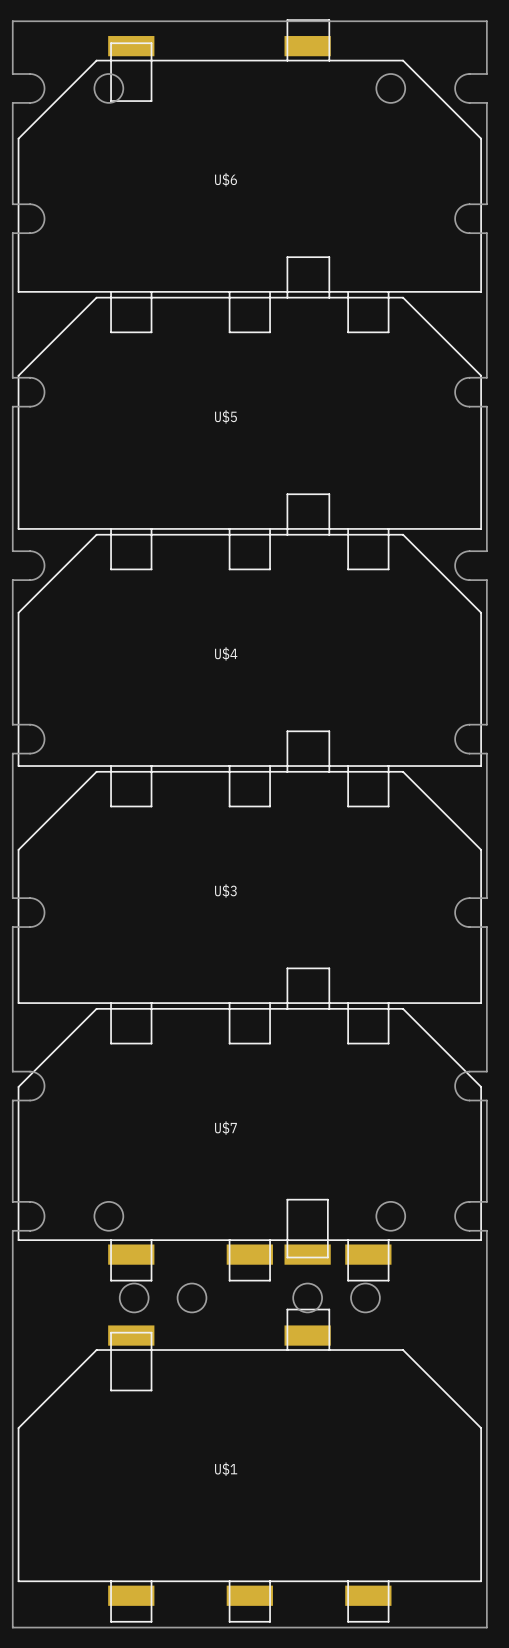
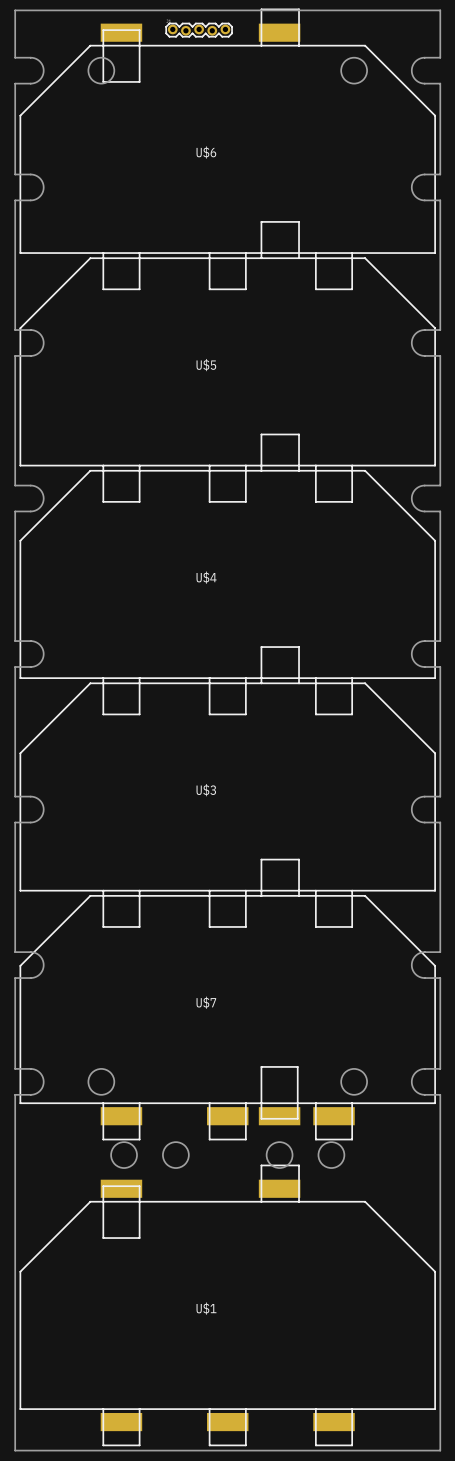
part: none -> (199, 30)

